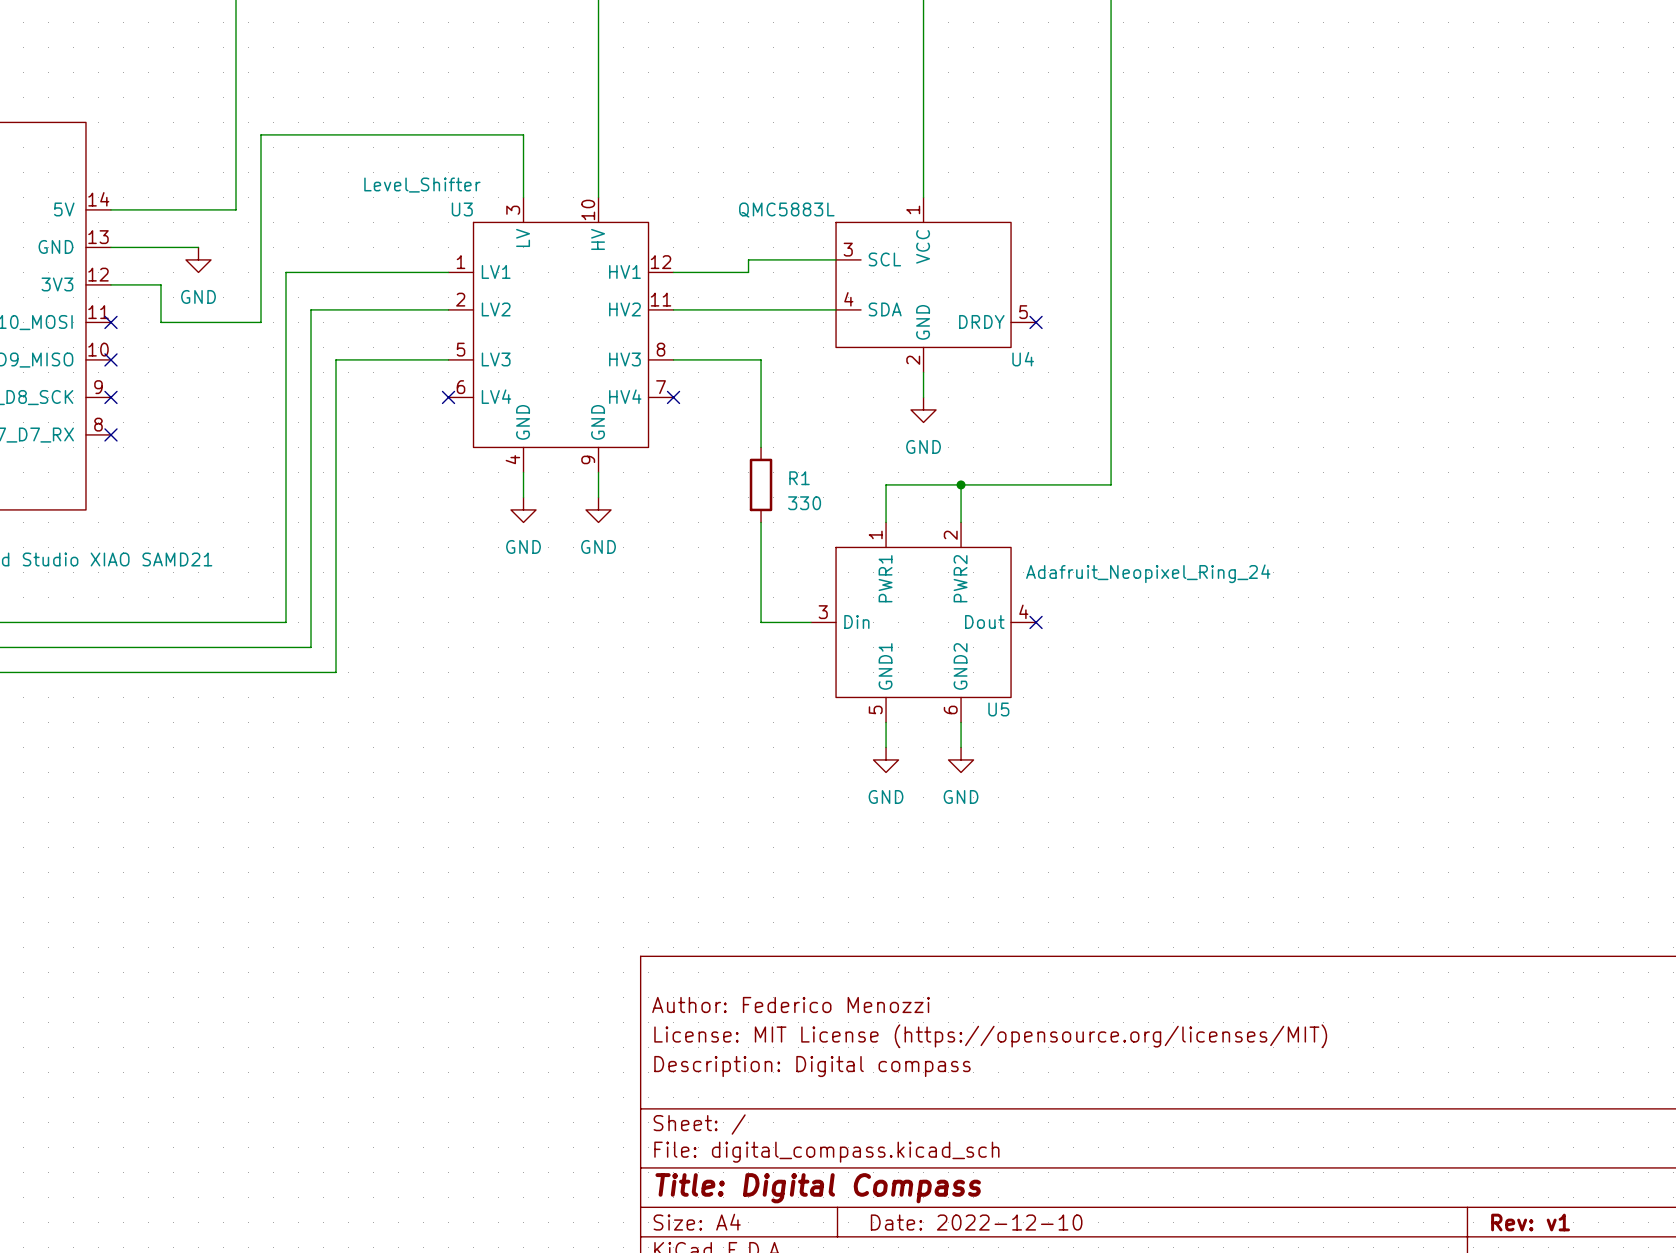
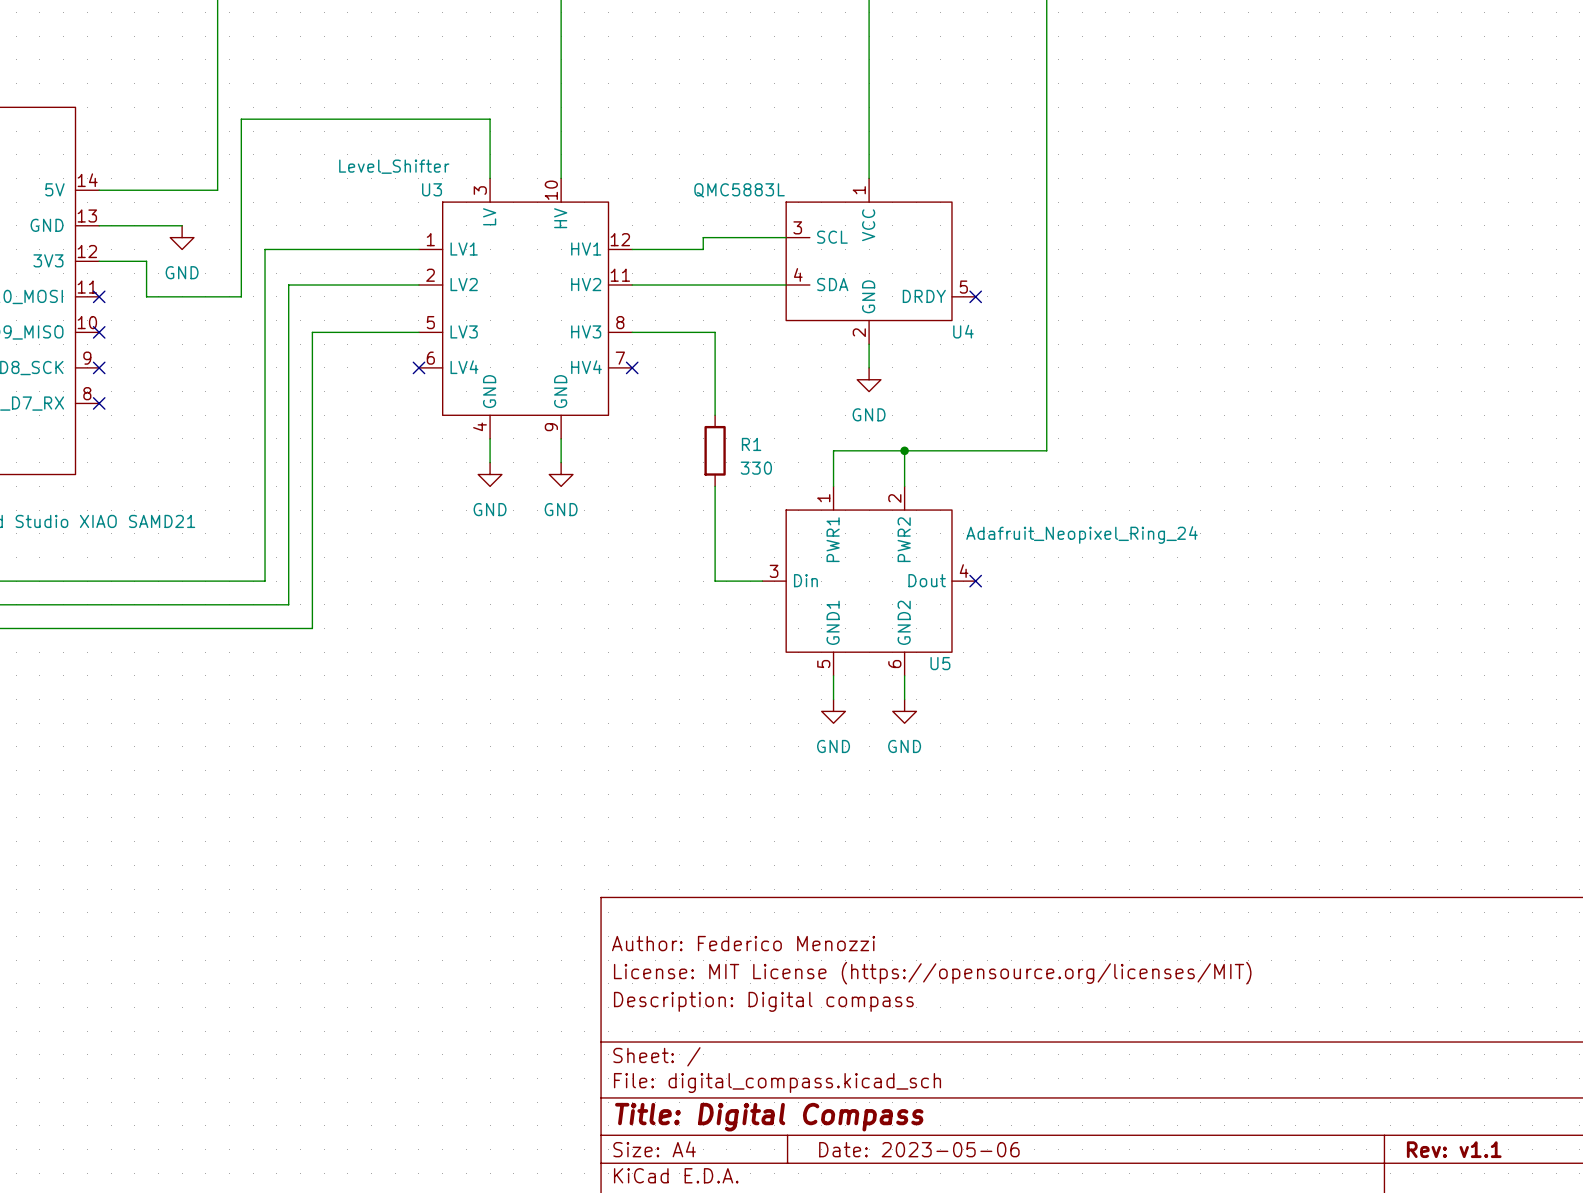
title block: Date: 2022-12-10 (976, 1222) -> Date: 2023-05-06 (919, 1149)
title block: Rev: v1 (1530, 1222) -> Rev: v1.1 (1454, 1149)

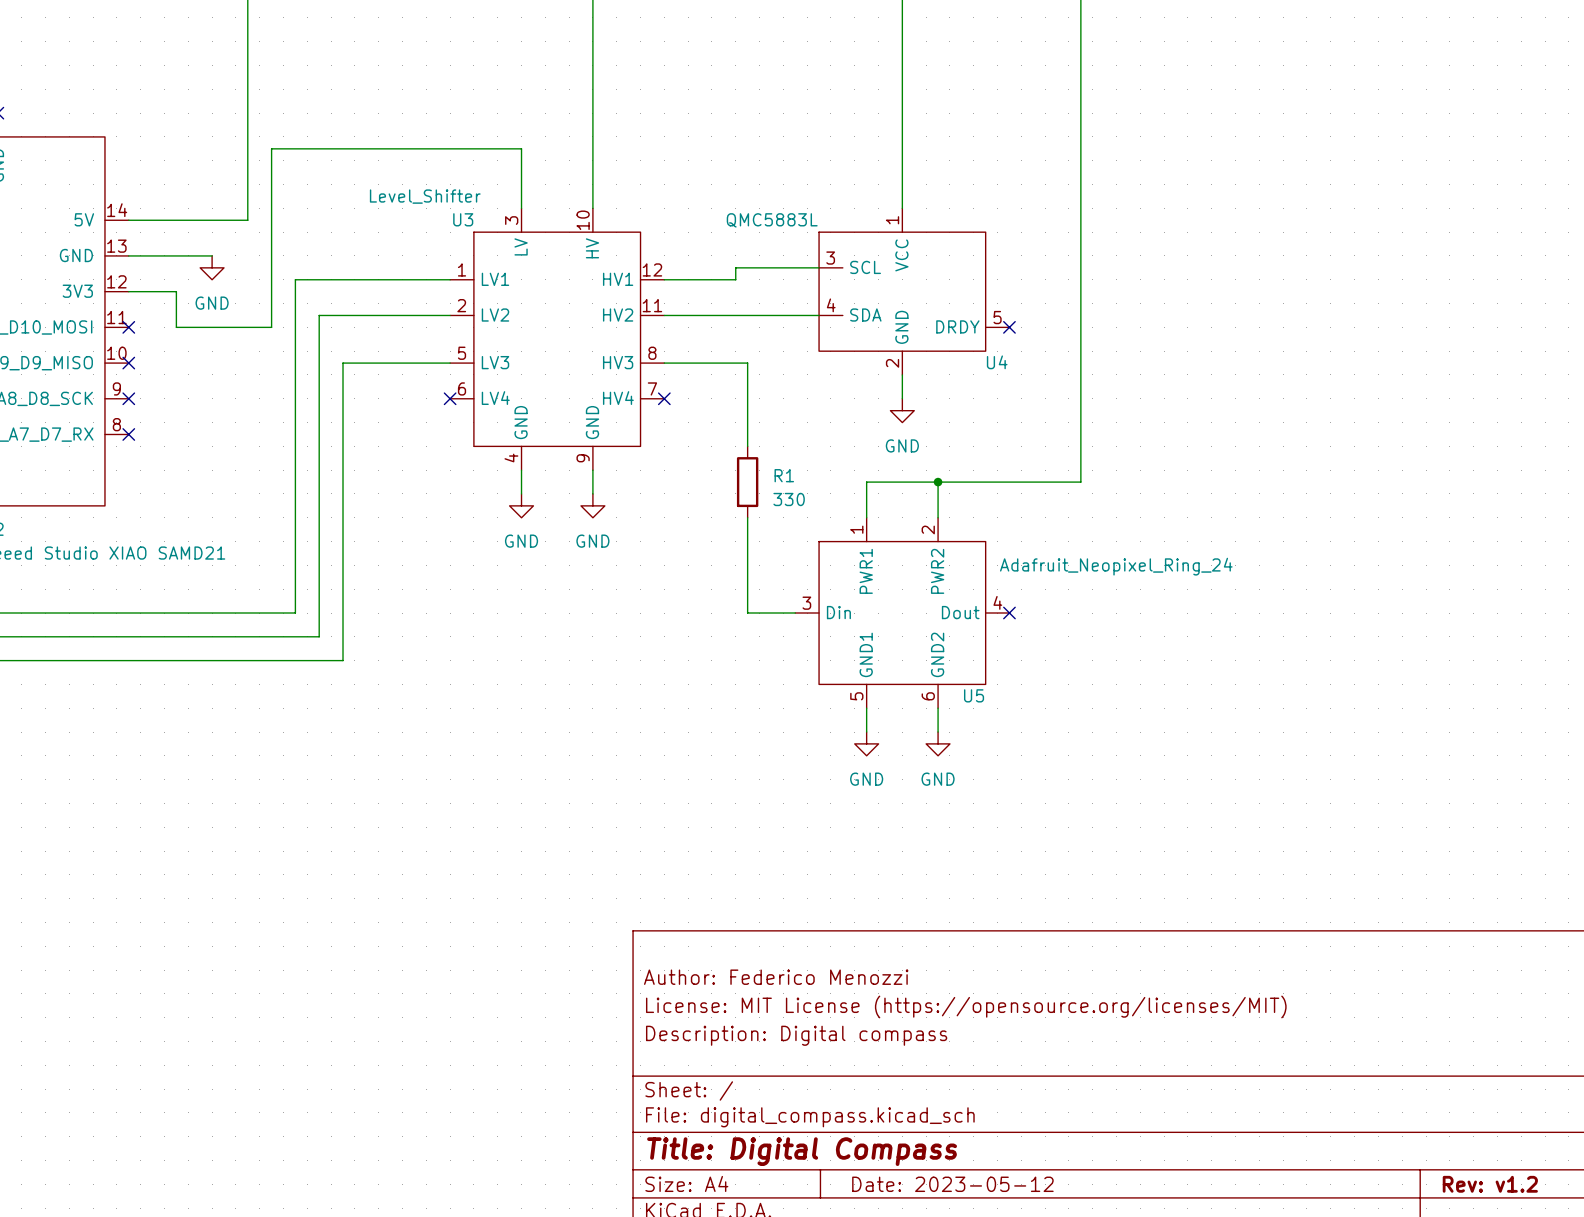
title block: Date: 2023-05-06 (919, 1149) -> Date: 2023-05-12 (952, 1184)
title block: Rev: v1.1 (1454, 1149) -> Rev: v1.2 (1490, 1184)

